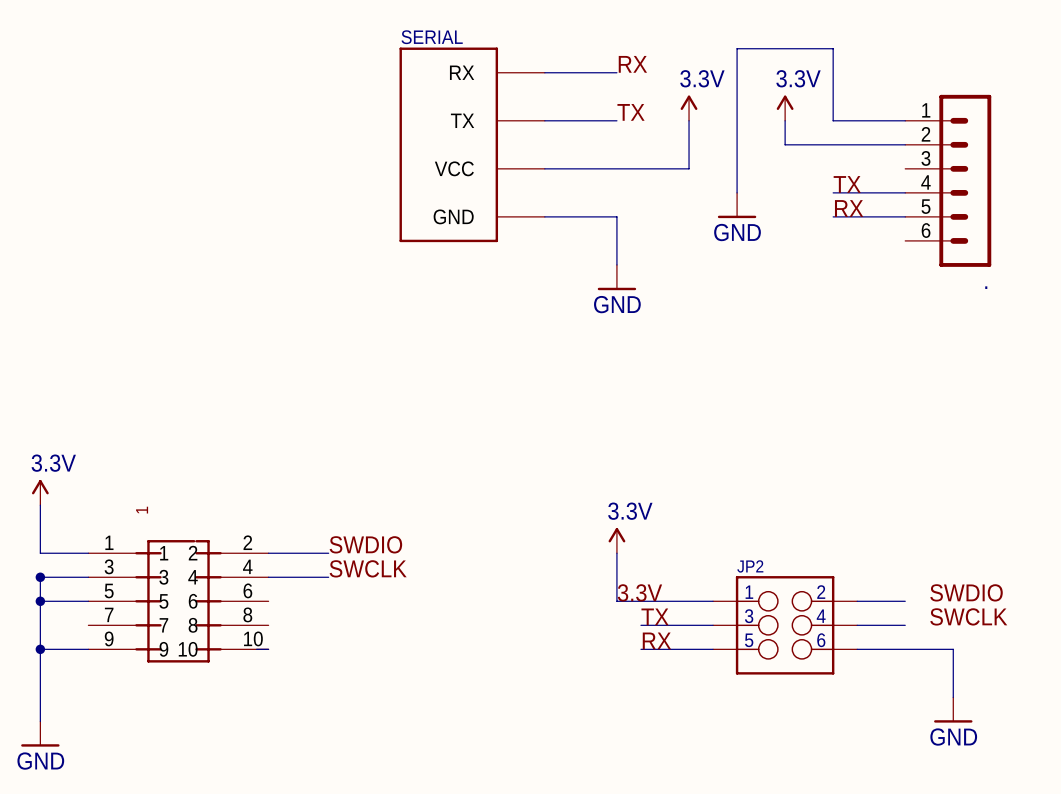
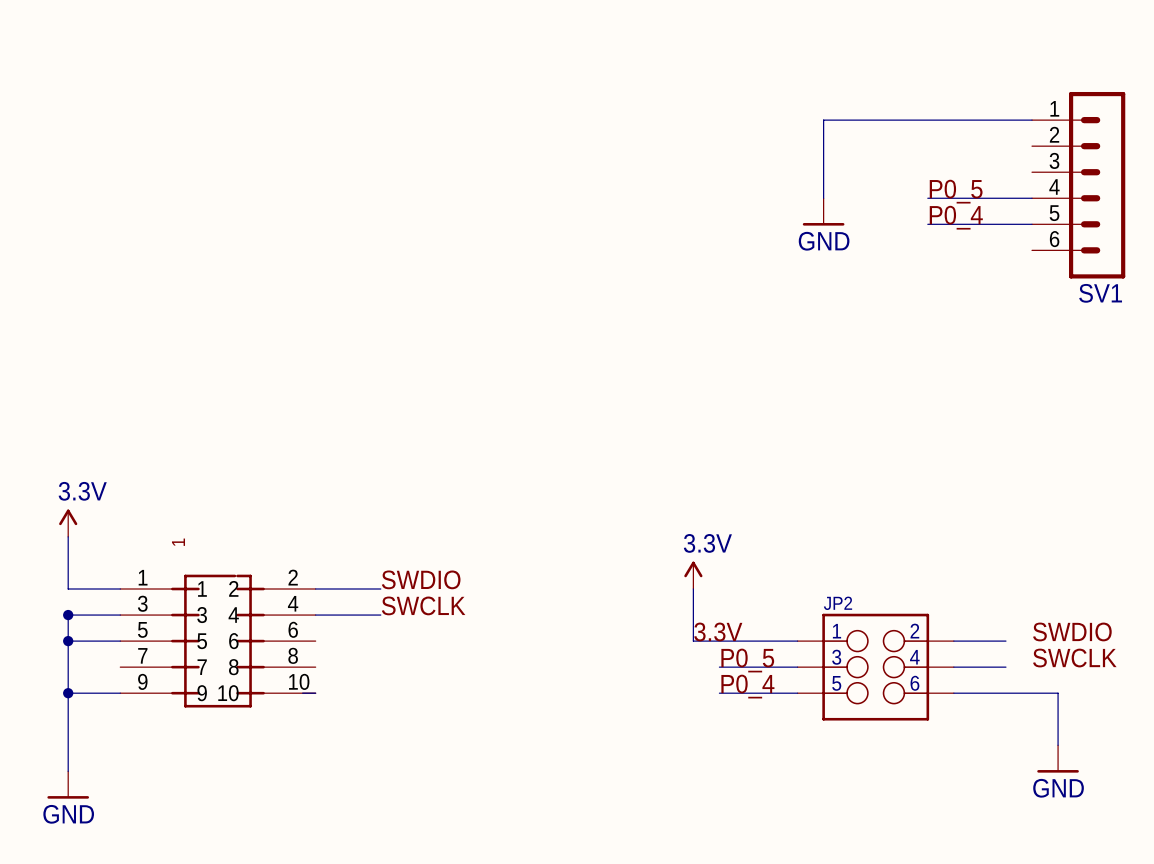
label: RX (632, 64) -> none
wire: (544, 72) (616, 72) -> none
power symbol: 3.3V (689, 108) -> none
power symbol: 3.3V (785, 108) -> none
label: TX (631, 112) -> none
wire: (544, 120) (616, 120) -> none
wire: (689, 120) (689, 168) (544, 168) -> none
wire: (737, 120) (737, 48) (833, 48) (833, 120) -> (823, 120) (927, 120)
wire: (785, 120) (785, 144) (905, 144) -> none
SERIAL: (472, 144) -> none
part: (948, 180) -> none
SV1: none -> (1078, 185)
label: TX (847, 184) -> P0_5 (956, 191)
label: RX (849, 208) -> P0_4 (956, 217)
wire: (544, 216) (616, 216) (616, 264) -> none
power symbol: GND (616, 277) -> none
label: TX (655, 616) -> P0_5 (747, 660)
label: RX (656, 640) -> P0_4 (747, 686)

